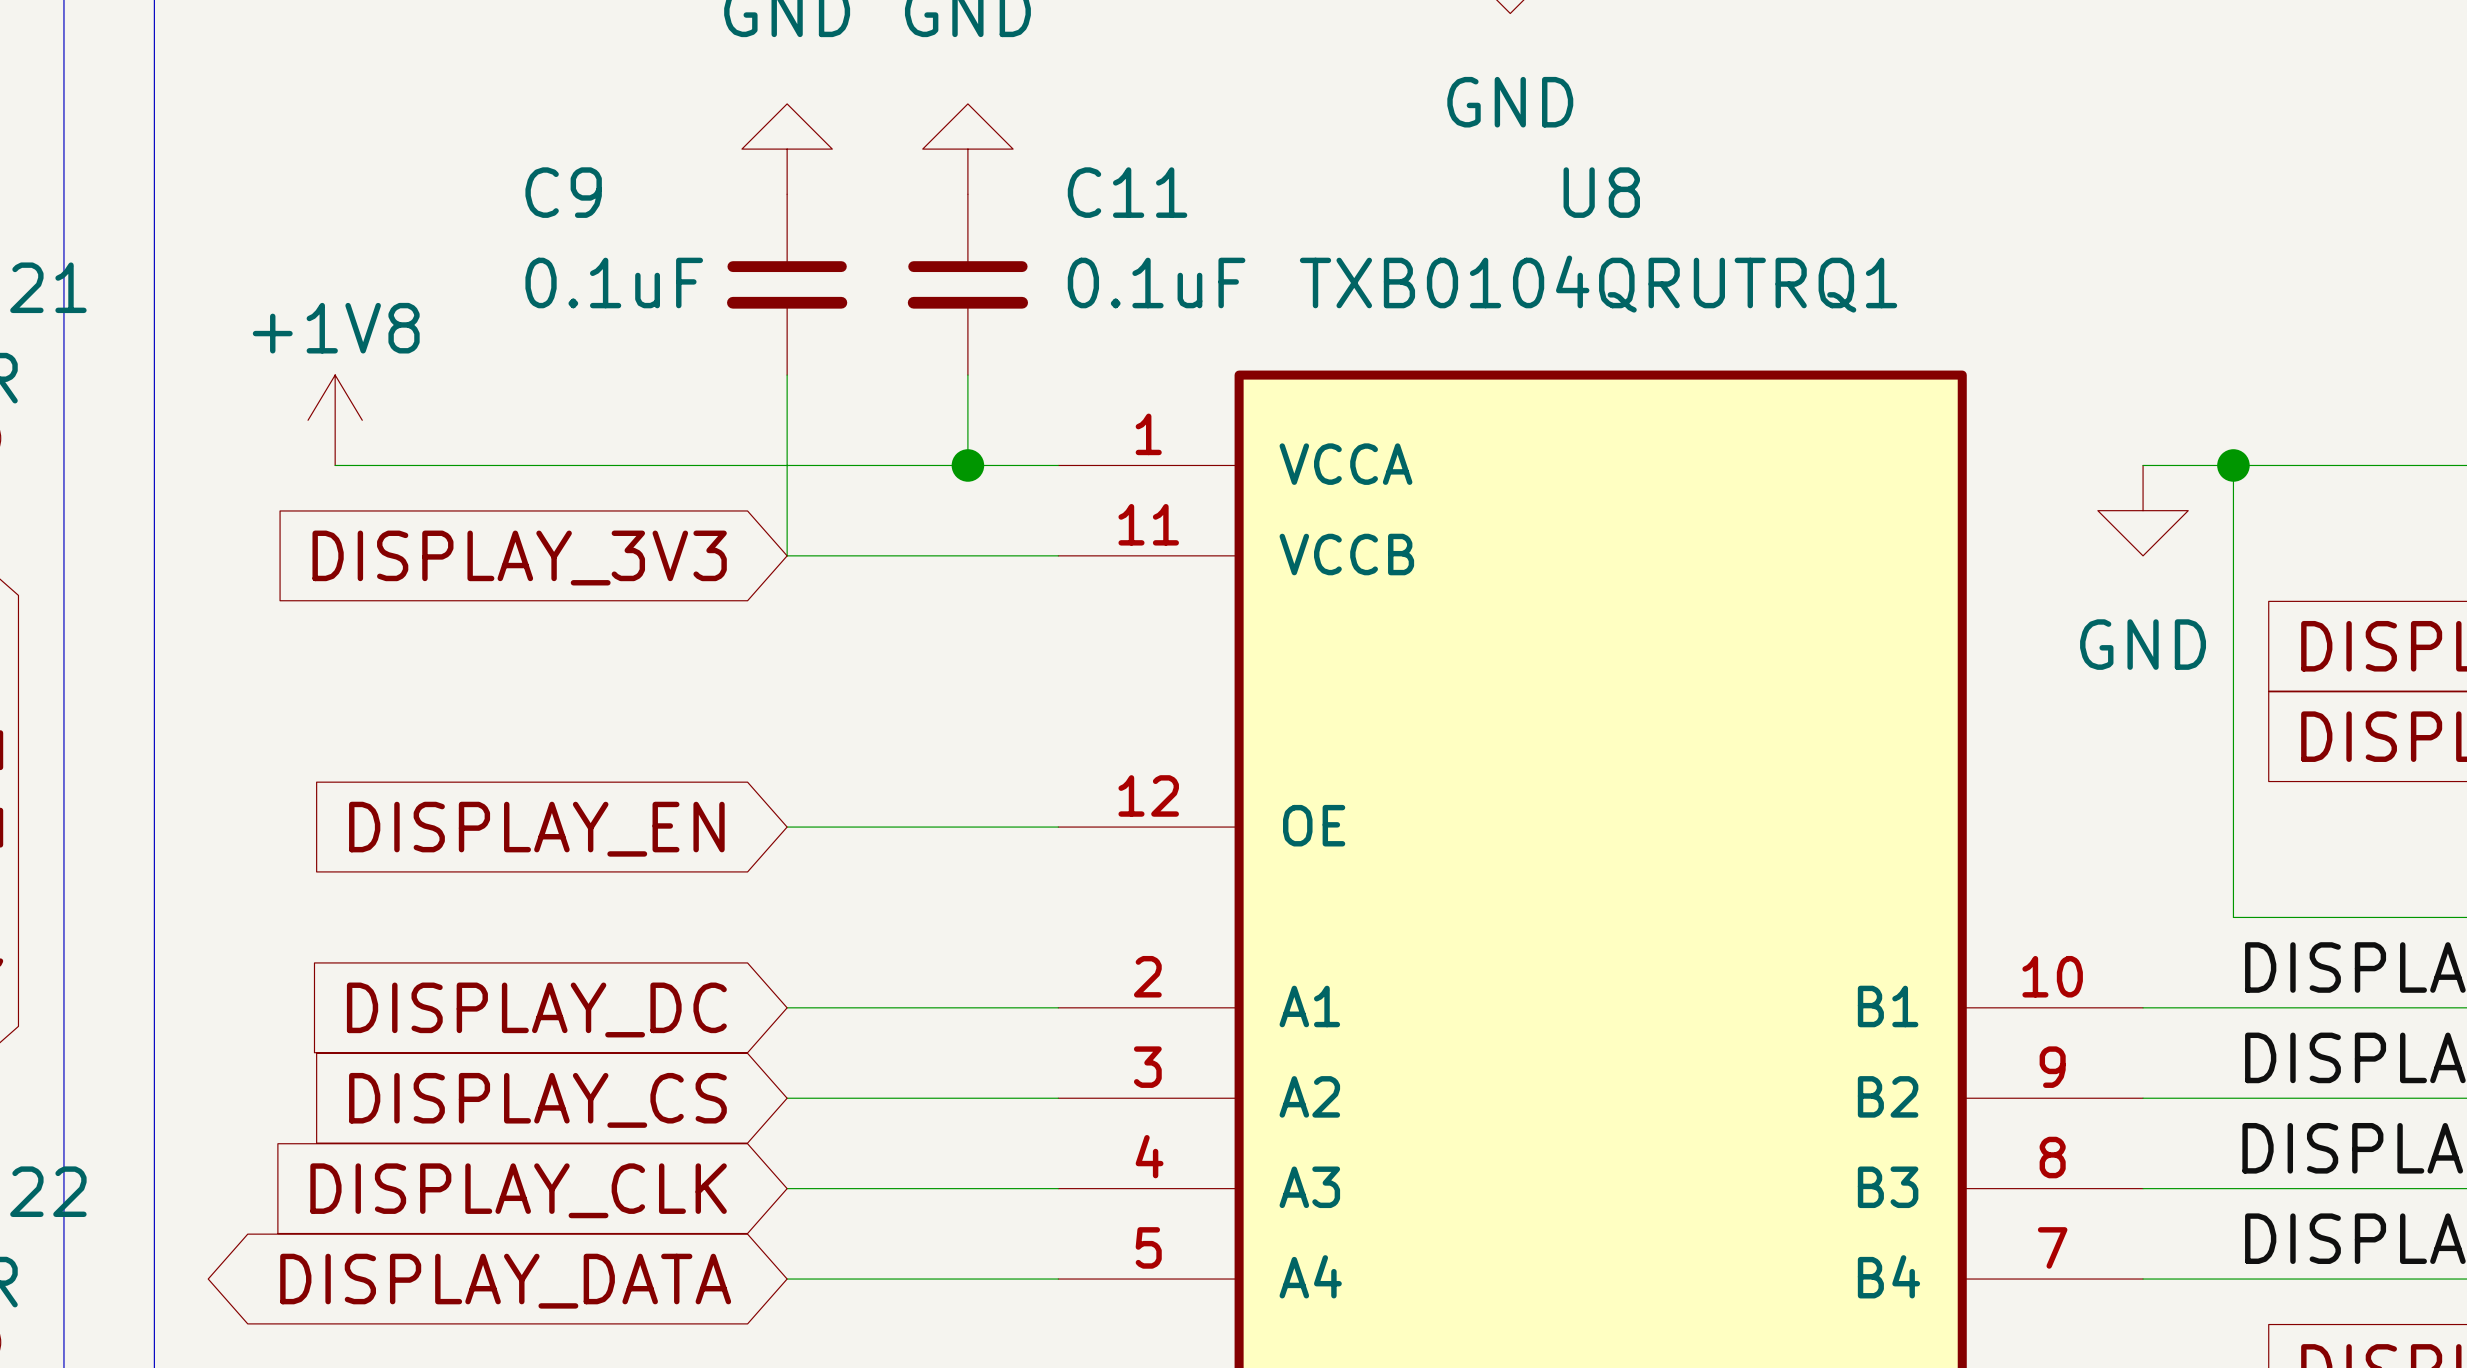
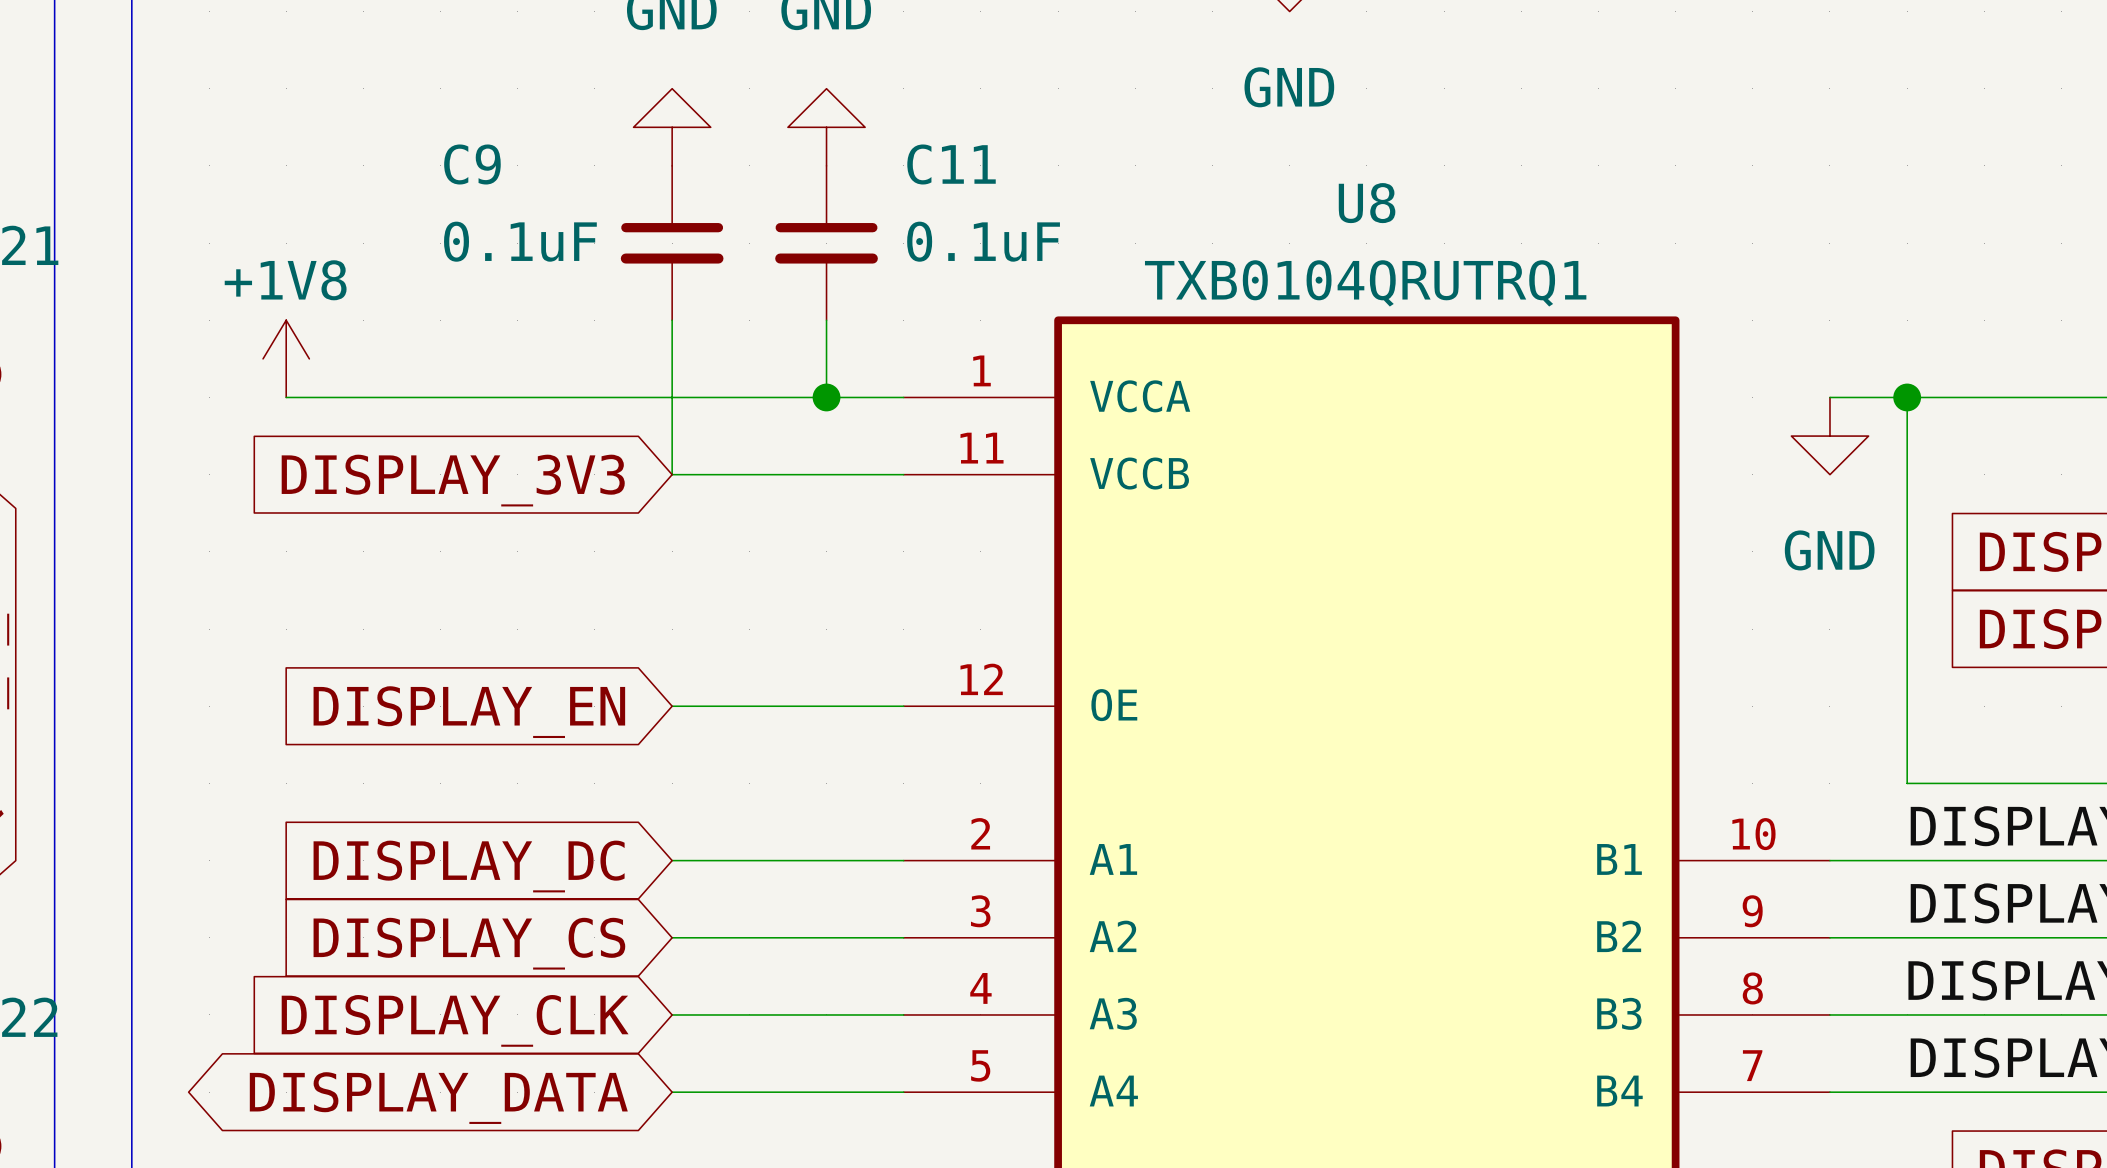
U8 name position: U8 (1601, 192) -> U8 (1367, 203)
U8 value position: TXB0104QRUTRQ1 (1598, 284) -> TXB0104QRUTRQ1 (1365, 283)

